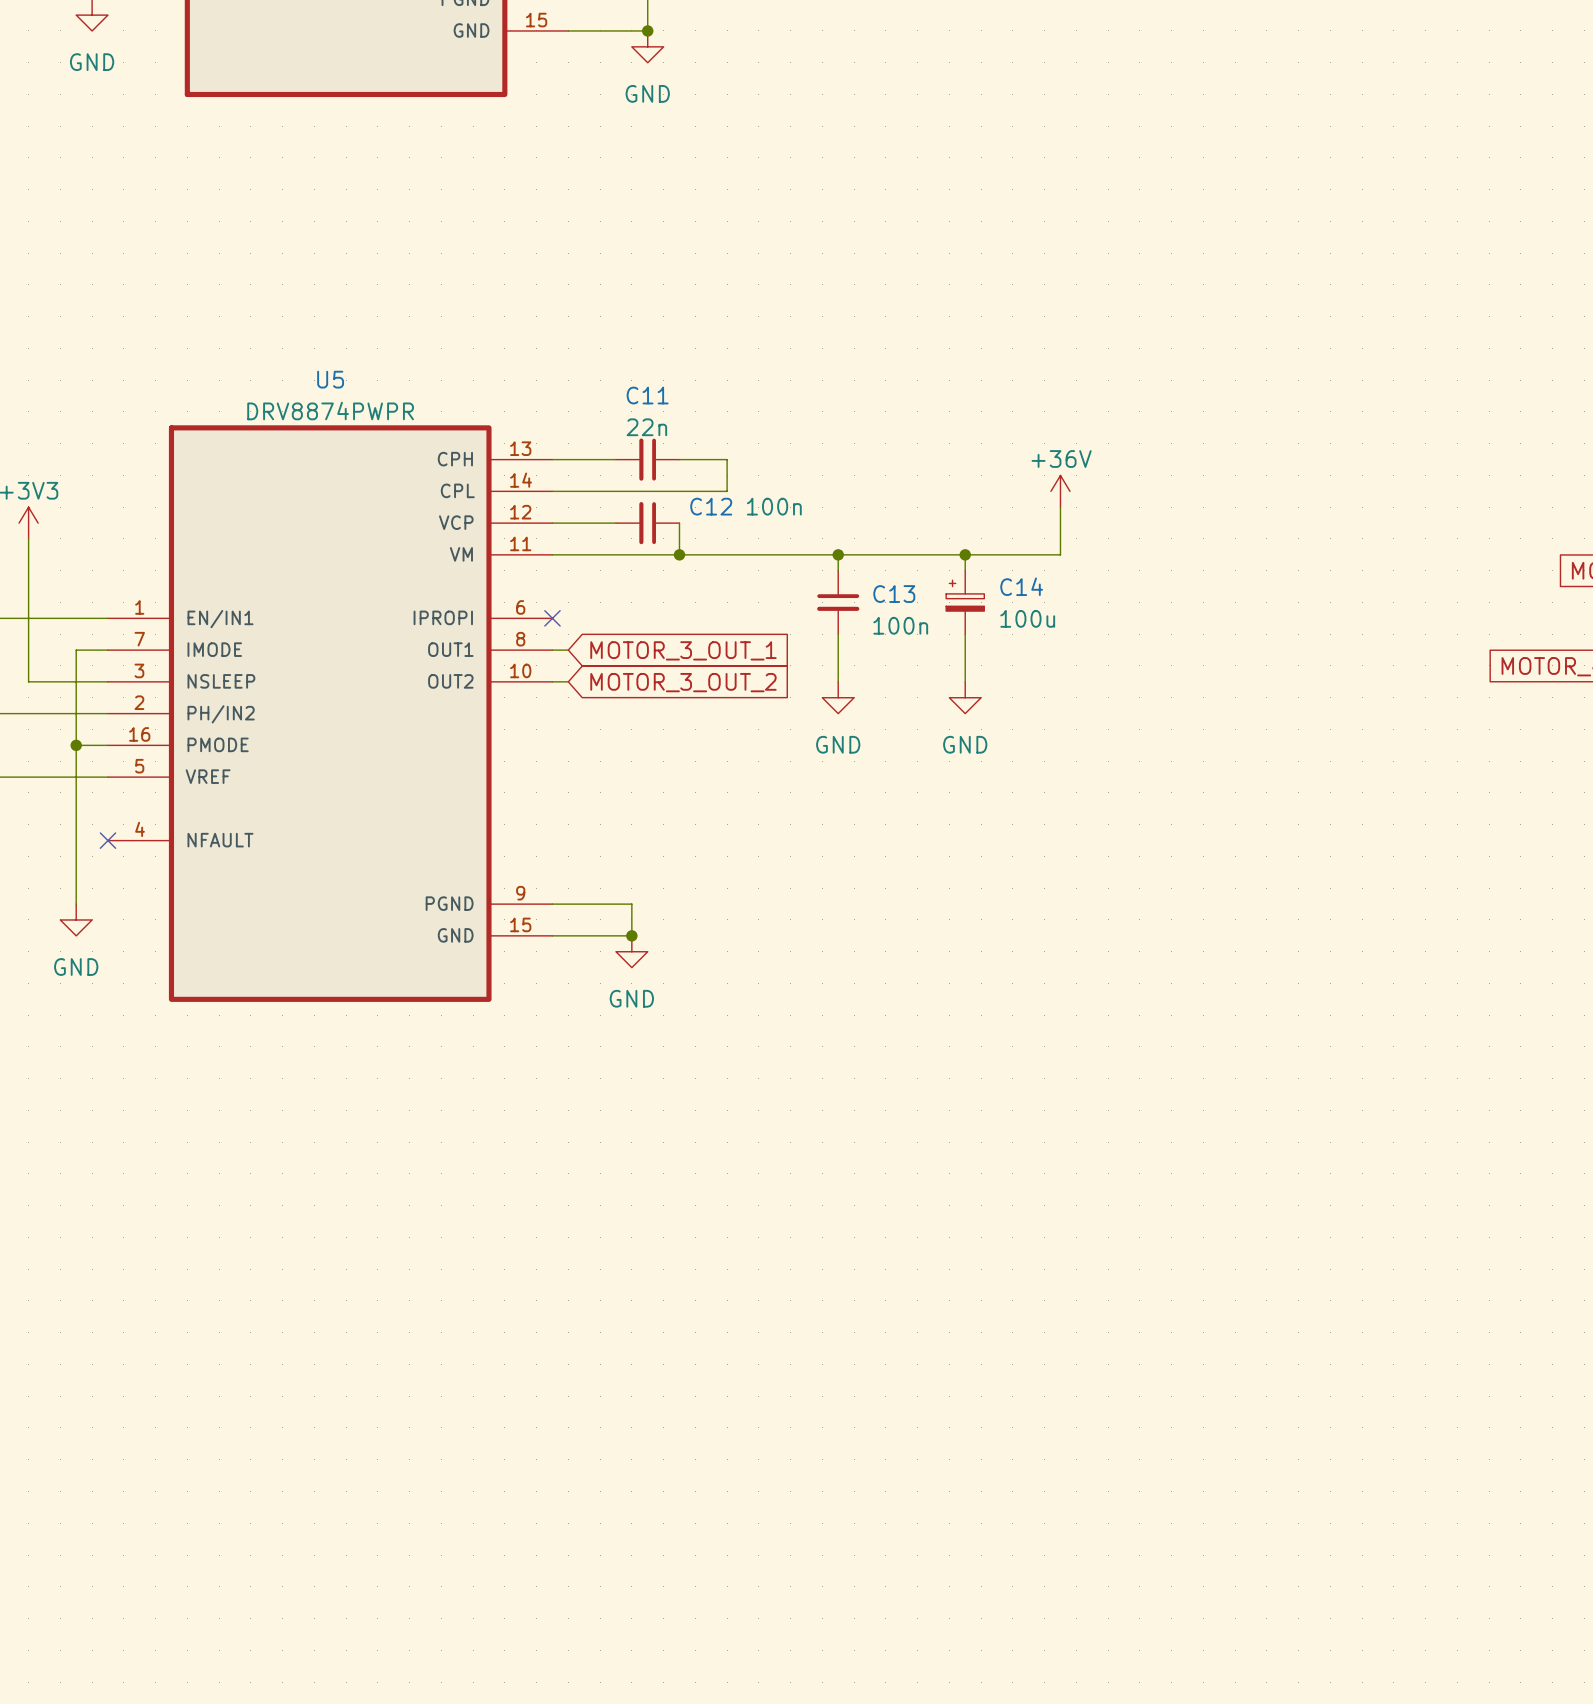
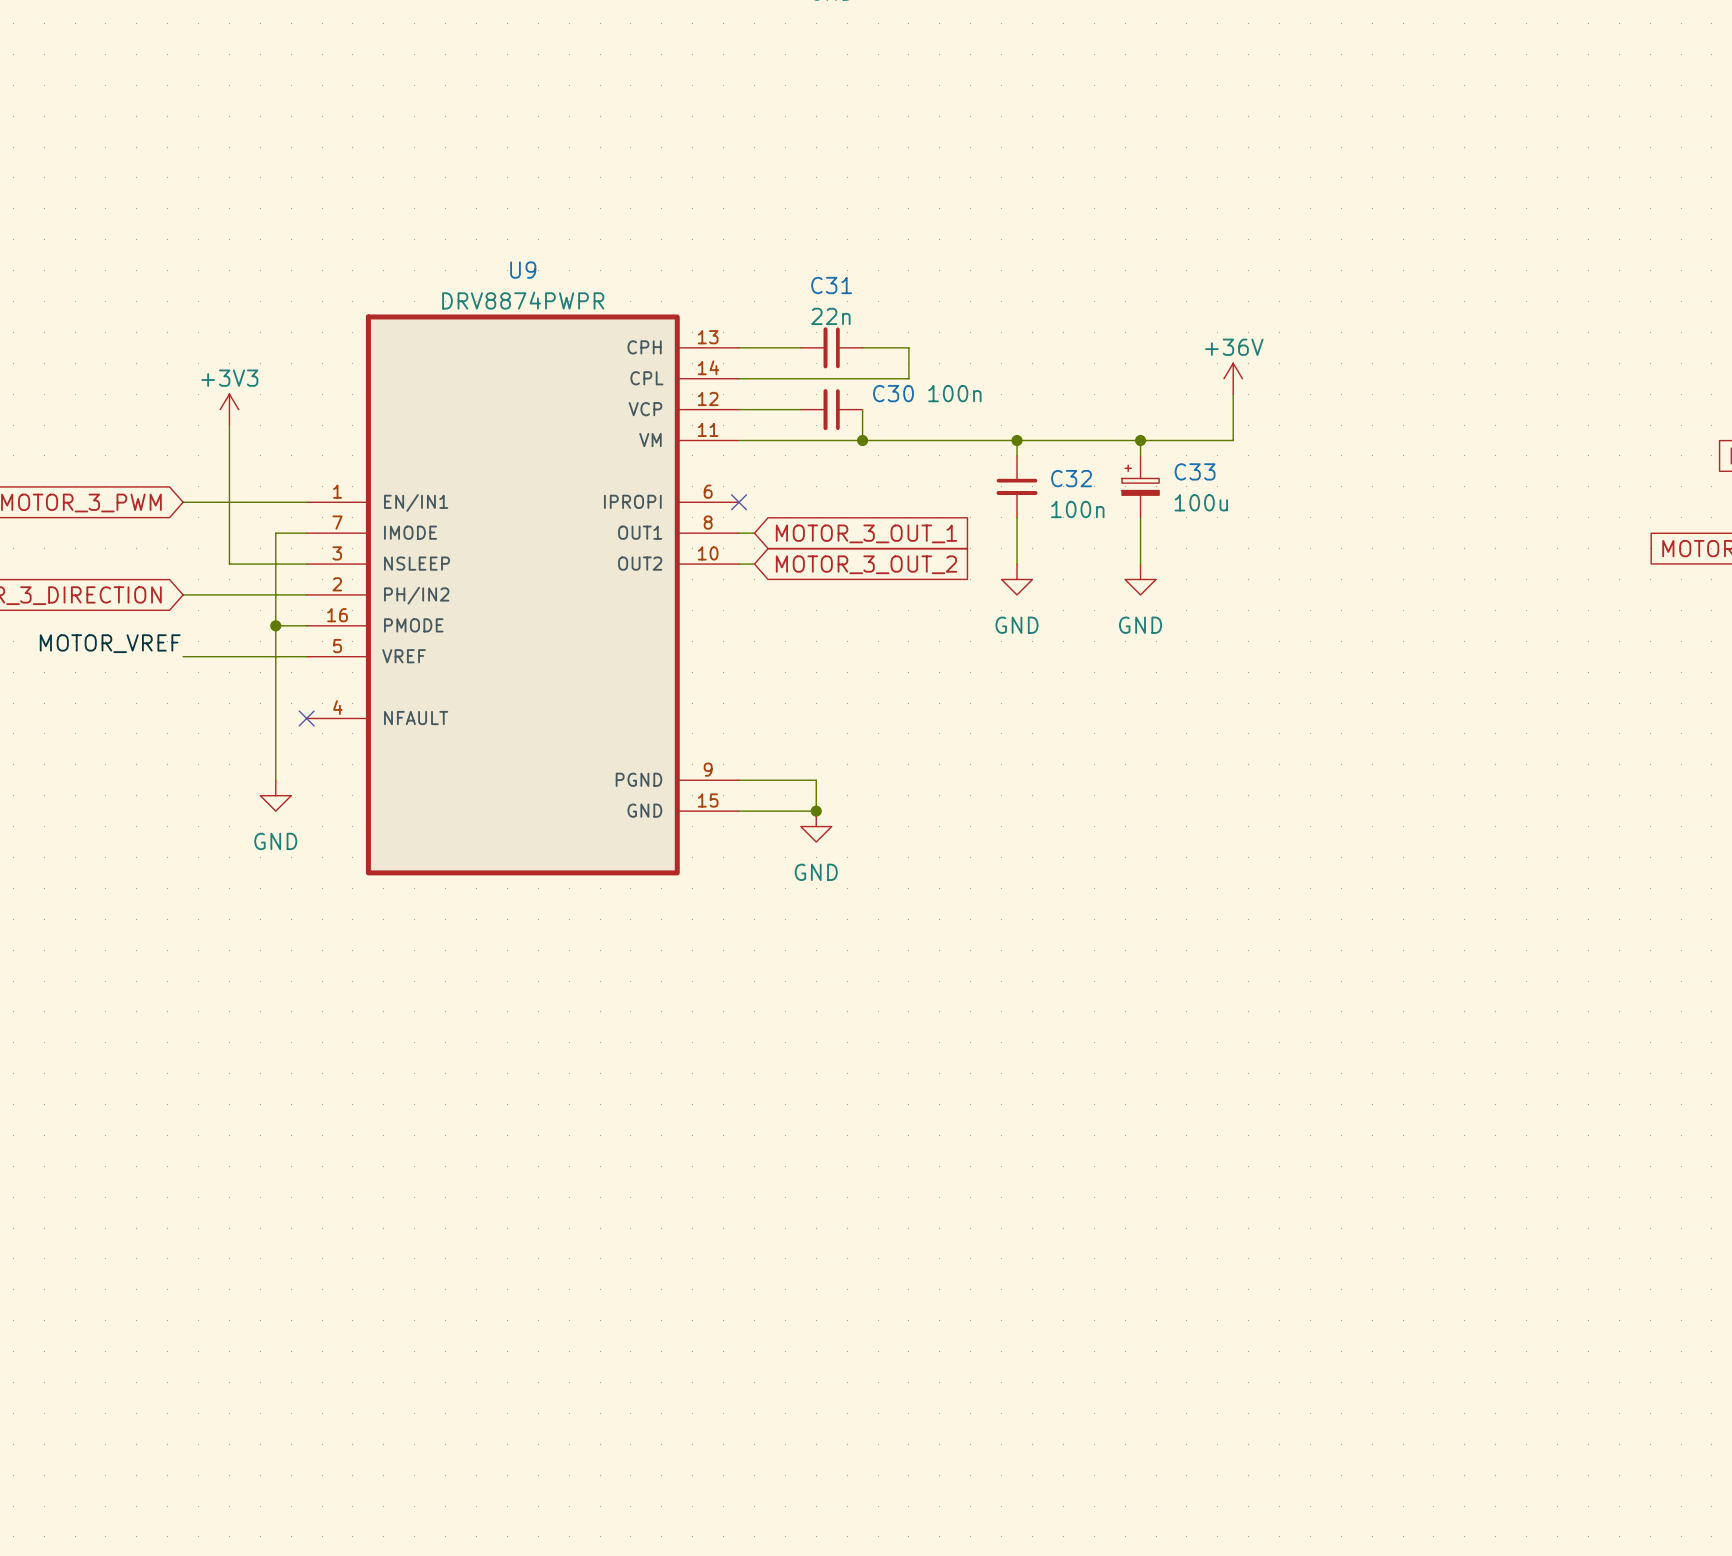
U5 name: U5 (330, 379) -> U9 (523, 270)
C11 name: C11 (647, 395) -> C31 (831, 285)
C12 name: C12 (711, 506) -> C30 (893, 393)
C14 name: C14 (1021, 586) -> C33 (1195, 471)
C13 name: C13 (894, 594) -> C32 (1071, 478)

